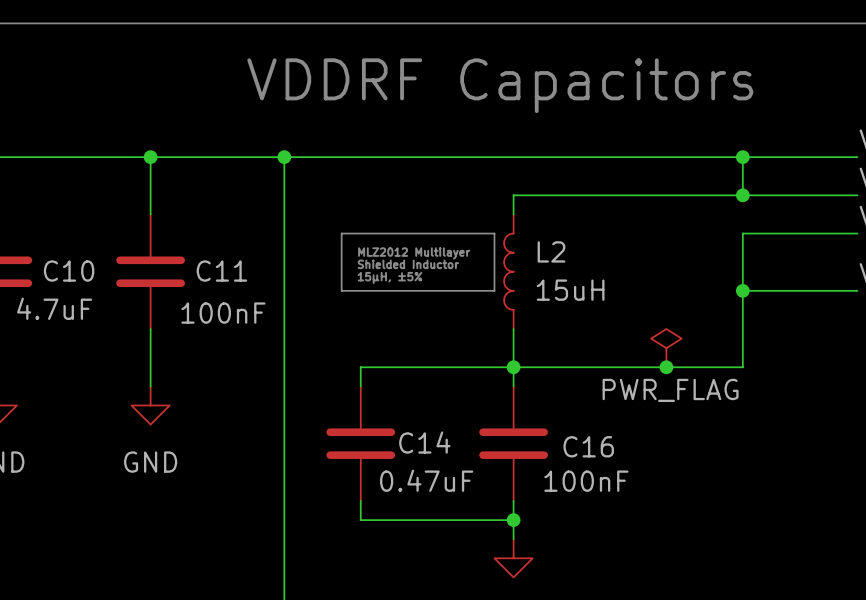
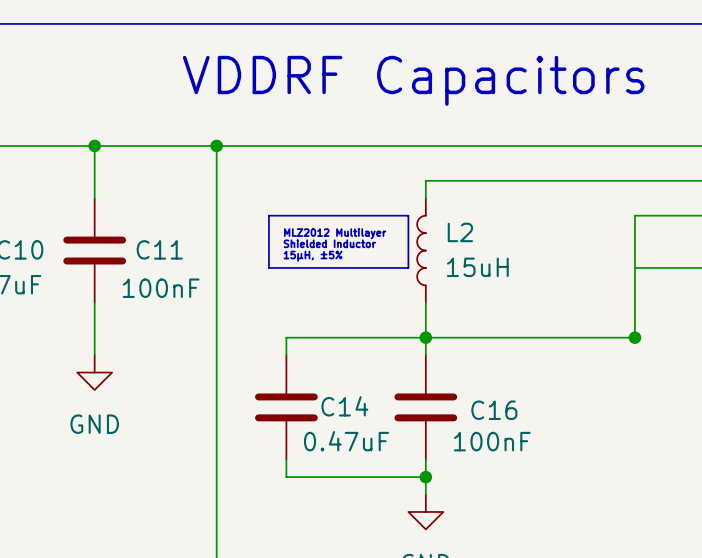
wire: (742, 157) (742, 195) -> none
junction: (742, 157) -> none
junction: (742, 195) -> none
junction: (742, 290) -> none
power symbol: PWR_FLAG (666, 348) -> none
junction: (666, 367) -> none
junction: none -> (634, 337)

